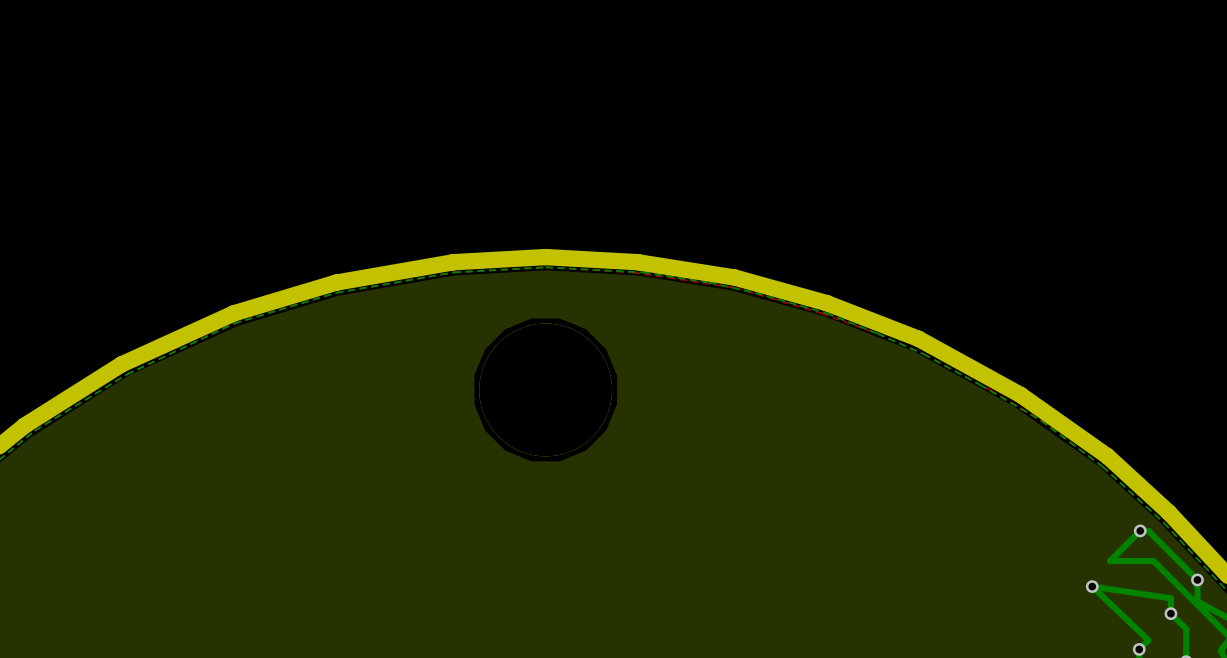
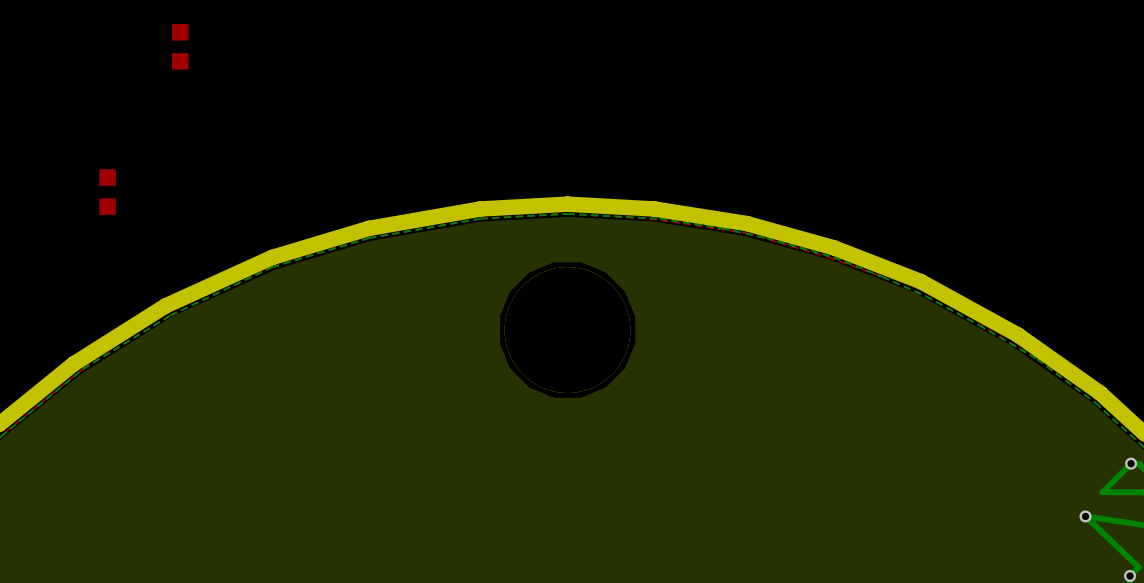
part: none -> (180, 46)
part: none -> (107, 192)

